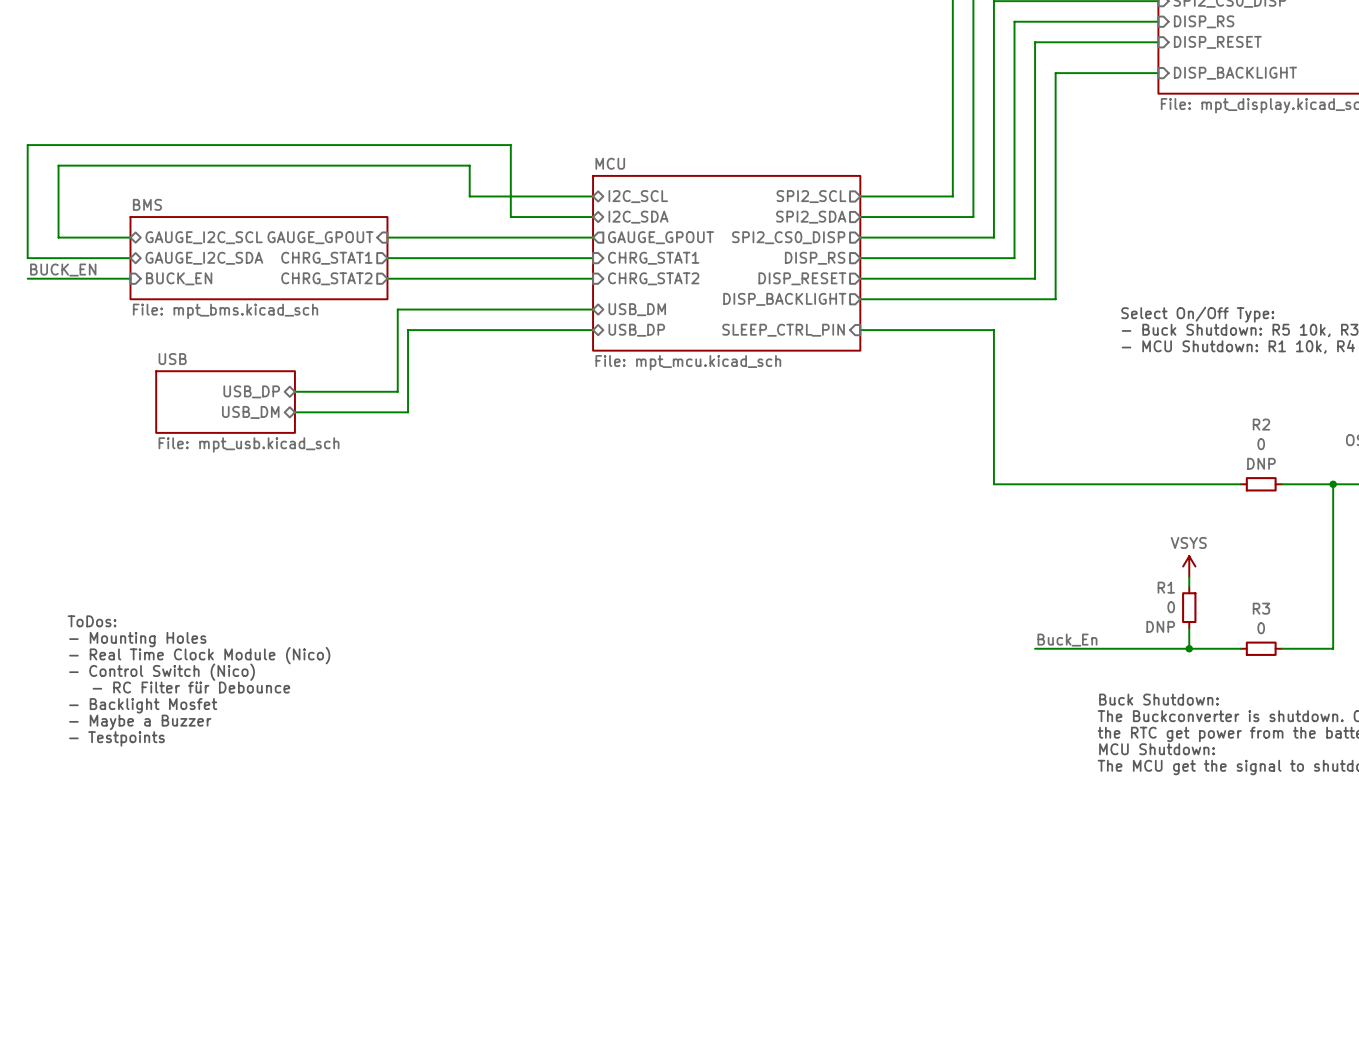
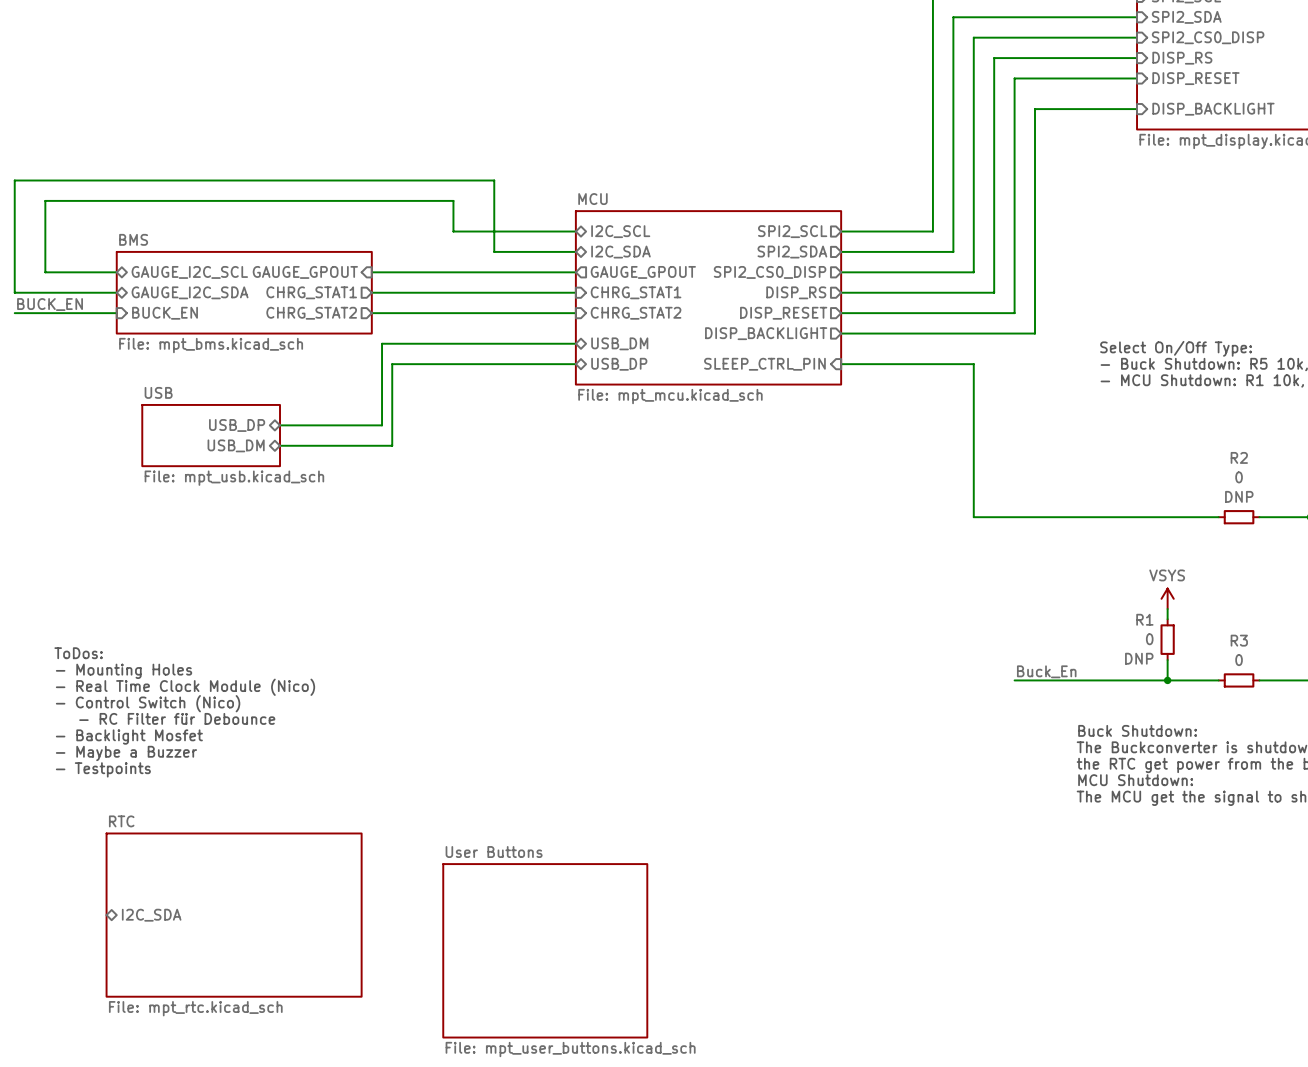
sheet pin: none -> I2C_SDA (151, 915)
sheet RTC: none -> File: mpt_rtc.kicad_sch (234, 915)
sheet User Buttons: none -> File: mpt_user_buttons.kicad_sch (545, 950)

